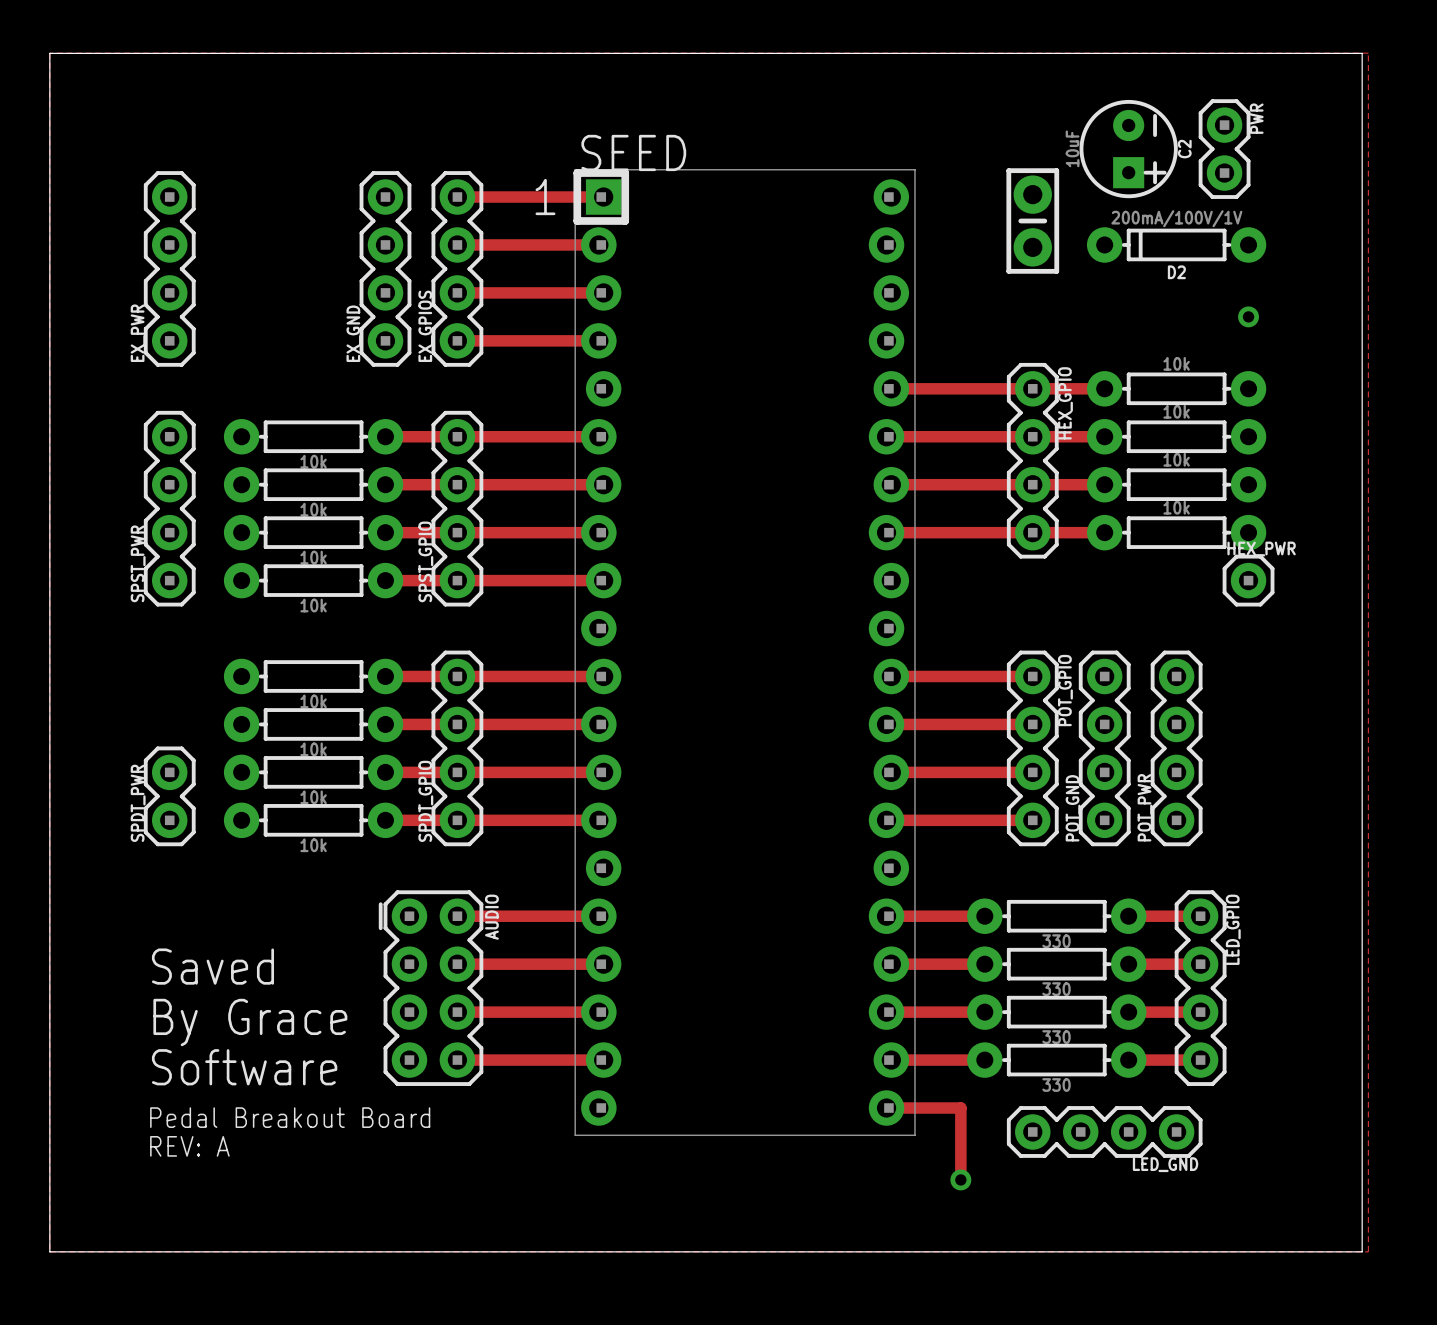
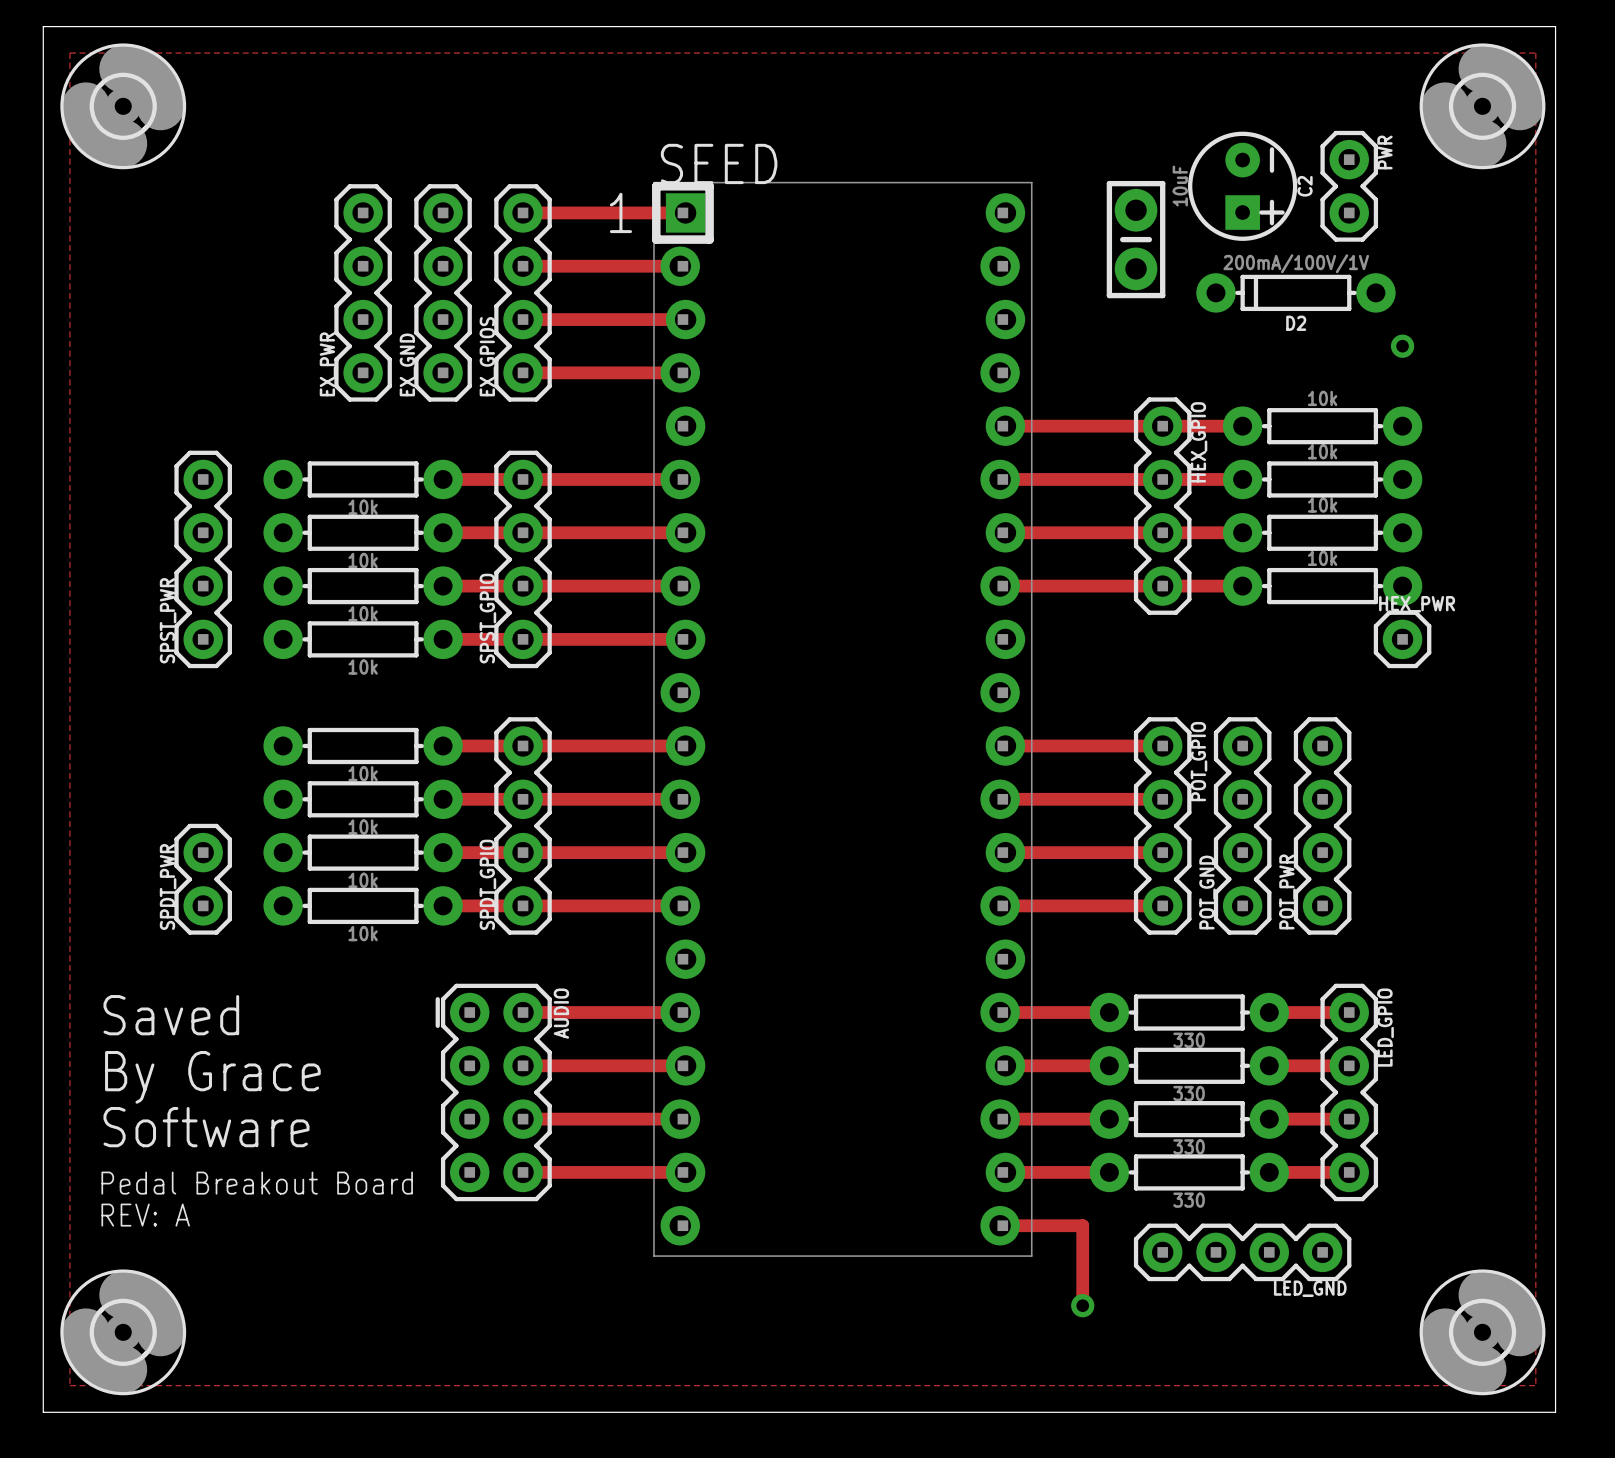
board edge: (49, 53) (1362, 53) (1362, 1251) (49, 1251) (49, 53) -> (43, 26) (43, 1412) (1555, 1412) (1555, 26) (43, 26)
part: none -> (123, 106)
part: none -> (1482, 106)
C2 position: (1128, 149) -> (1242, 186)
PWR position: (1224, 149) -> (1349, 186)
part position: (1032, 221) -> (1136, 239)
D2 position: (1176, 244) -> (1295, 292)
EX_PWR position: (169, 268) -> (363, 292)
text position: Saved (212, 966) -> Saved (171, 1015)
text position: By Grace (250, 1022) -> By Grace (212, 1077)
text position: Software (244, 1067) -> Software (206, 1127)
text position: Pedal Breakout Board (290, 1117) -> Pedal Breakout Board (257, 1183)
text position: REV: A (189, 1146) -> REV: A (145, 1215)
part: none -> (123, 1332)
part: none -> (1482, 1332)

